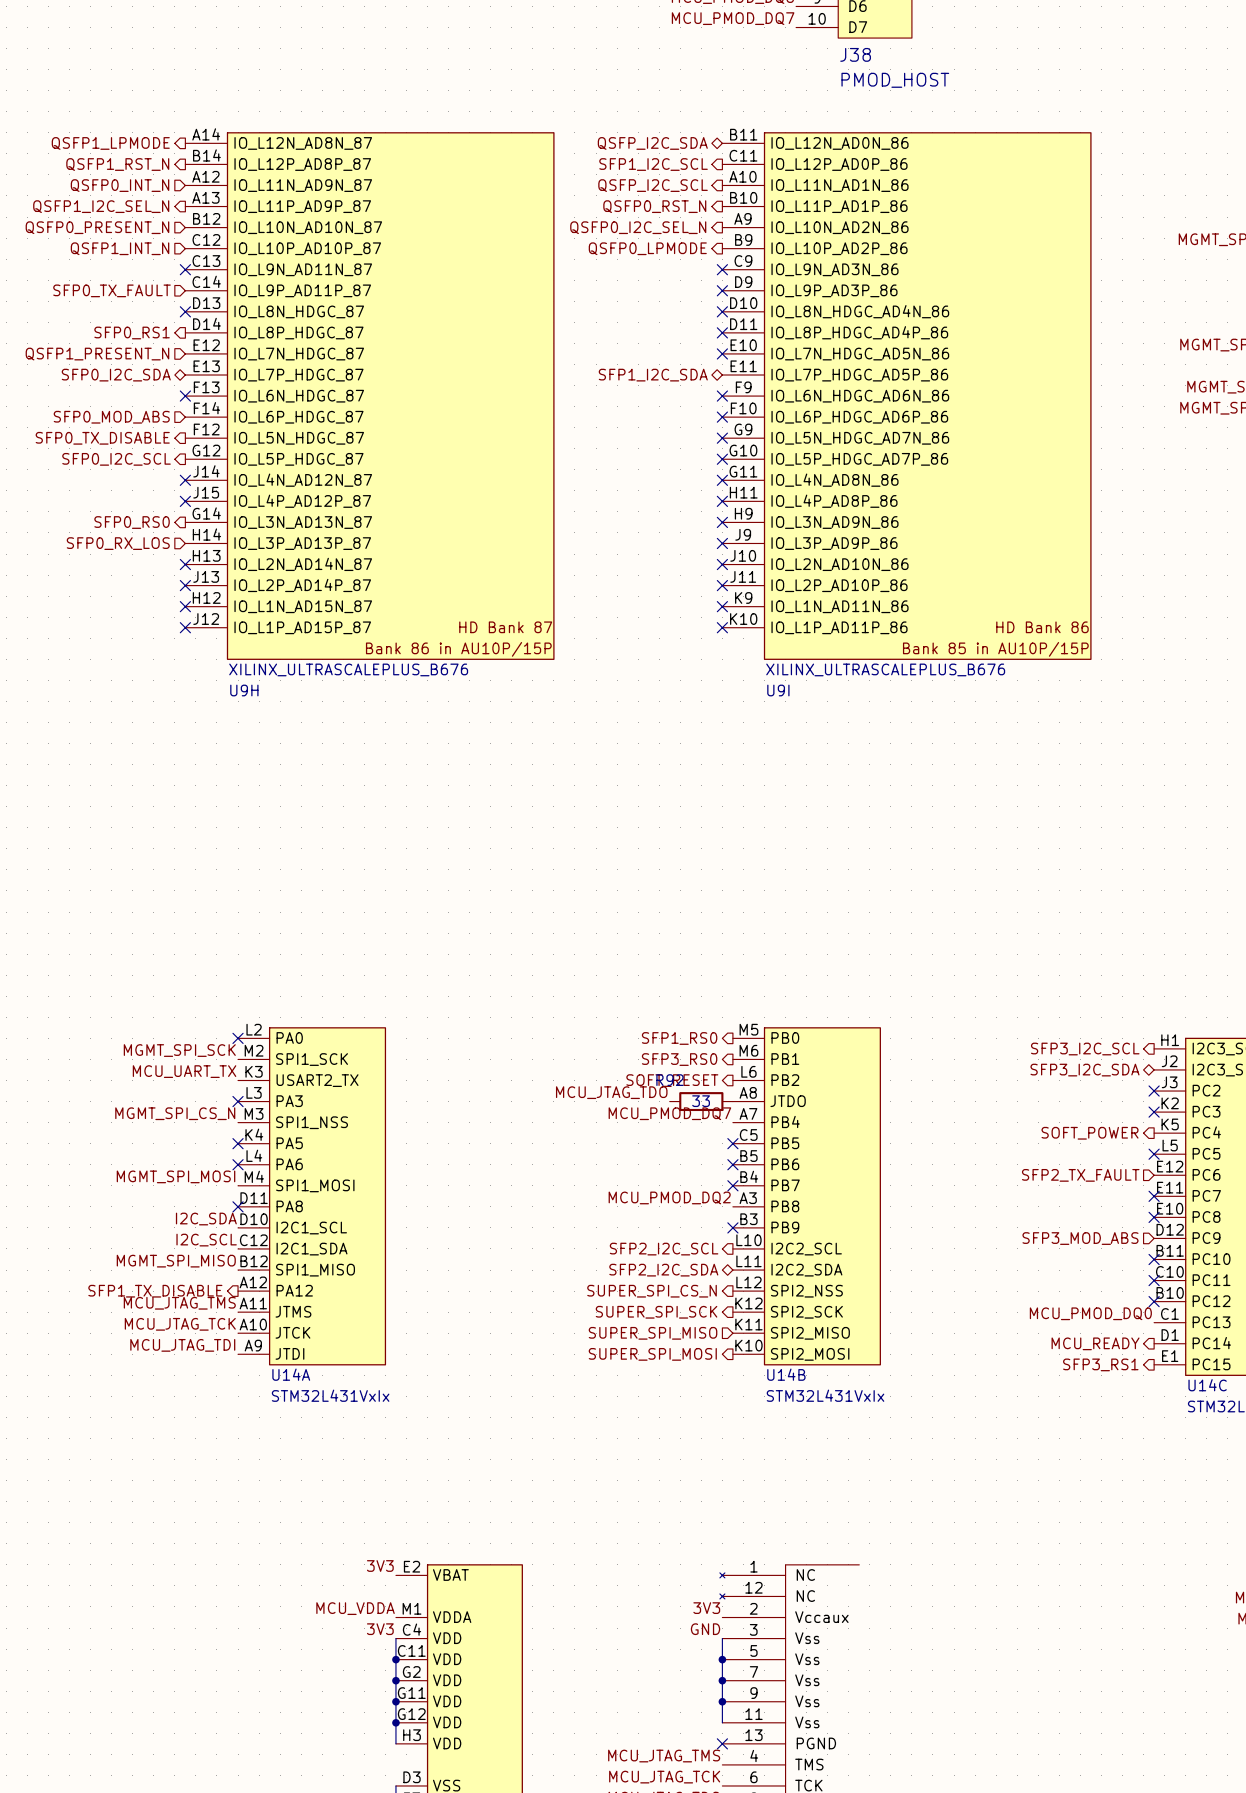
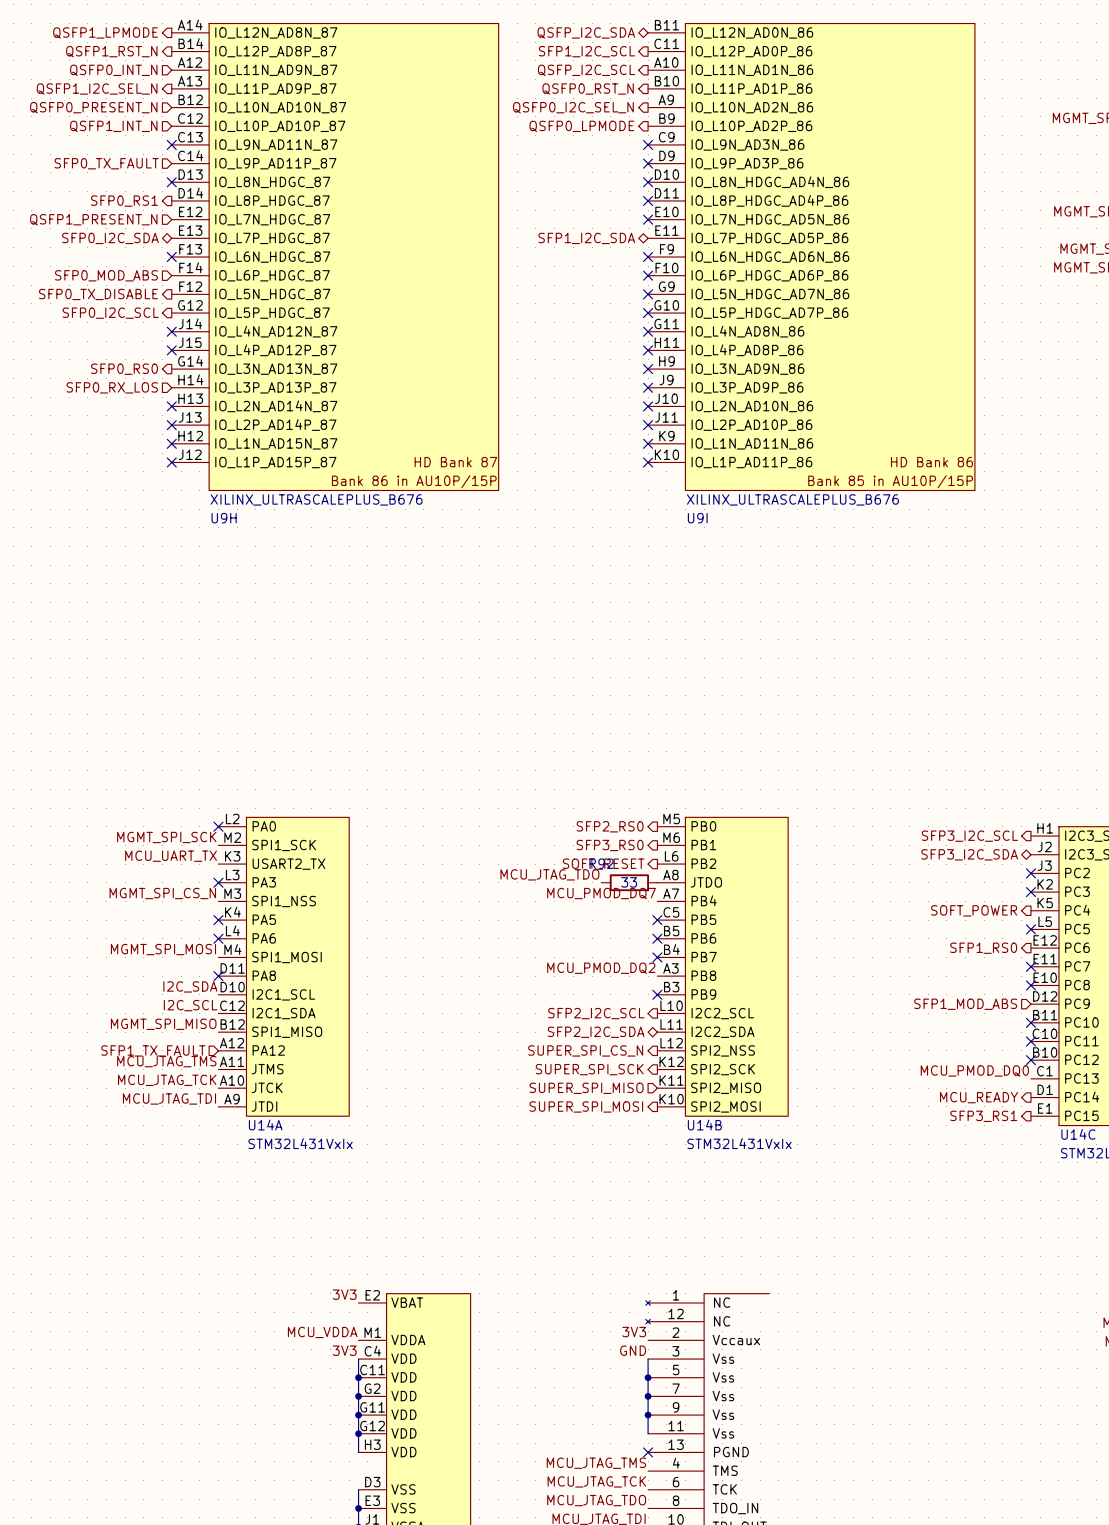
hierarchical label: SFP1_RS0 (679, 1038) -> SFP2_RS0 (610, 826)
hierarchical label shape: input (1080, 1175) -> output (983, 948)
hierarchical label: SFP2_TX_FAULT (1080, 1175) -> SFP1_RS0 (983, 948)
hierarchical label: SFP3_MOD_ABS (1080, 1238) -> SFP1_MOD_ABS (965, 1004)
hierarchical label shape: output (155, 1291) -> input (153, 1050)
hierarchical label: SFP1_TX_DISABLE (155, 1291) -> SFP1_TX_FAULT (153, 1050)

